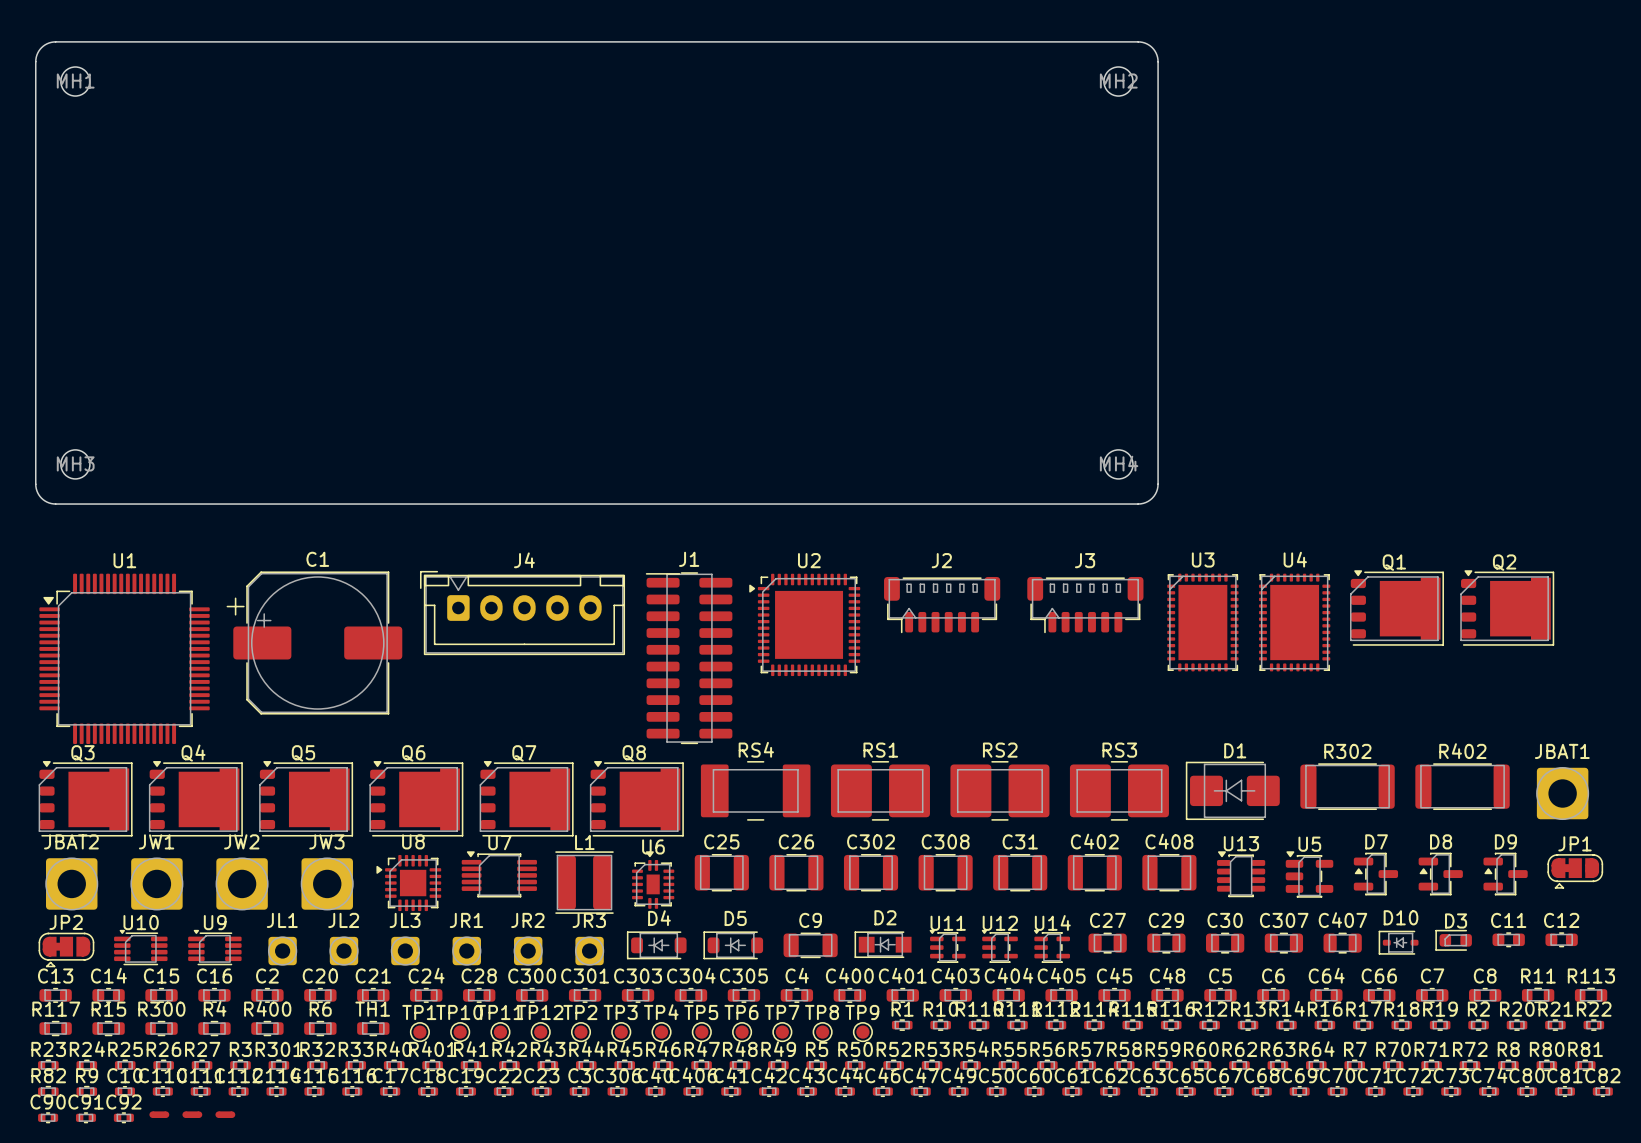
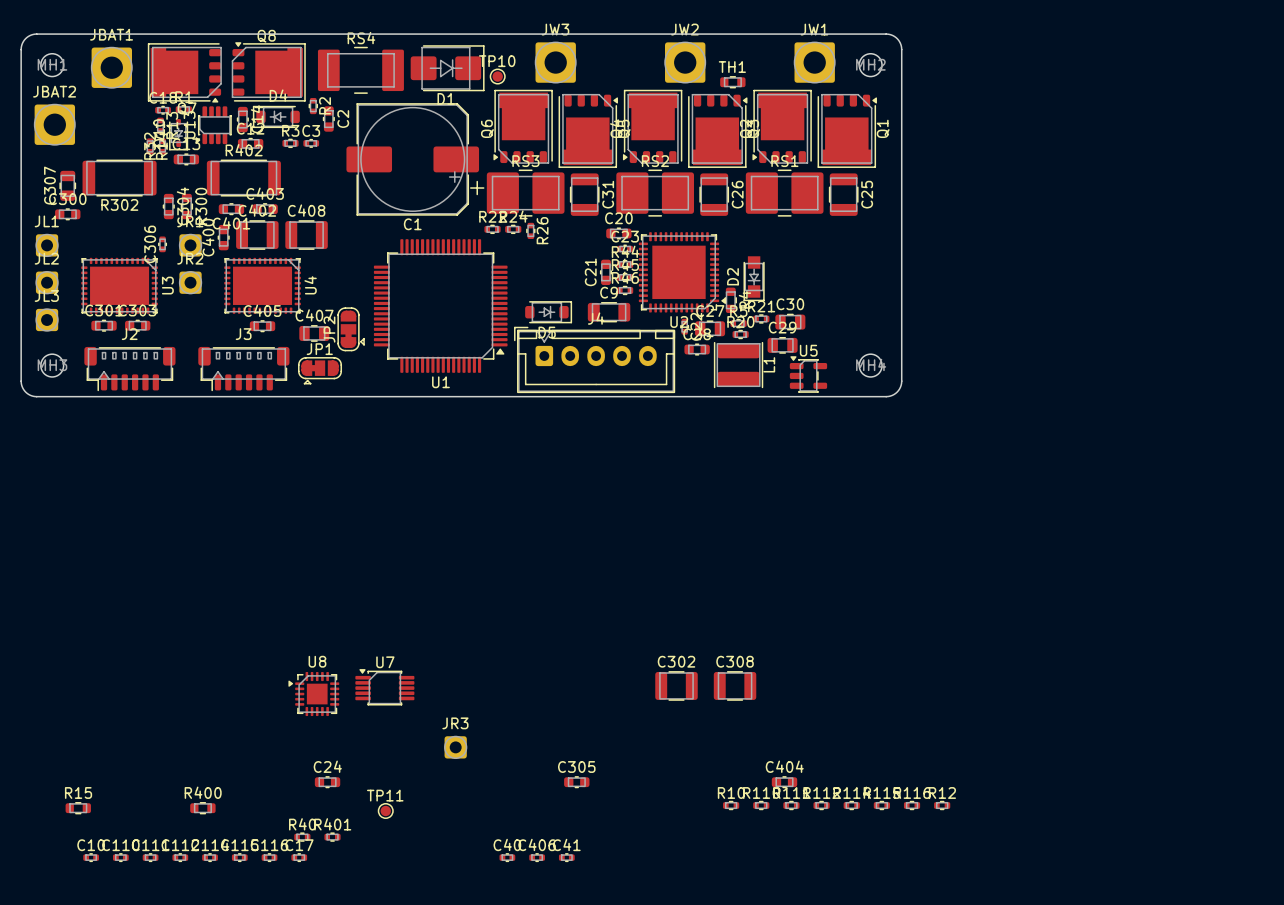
J2 position: (942, 605) -> (129, 368)
J3 position: (1085, 605) -> (243, 368)
Q1 rotation: 0° (1397, 608) -> 90° clockwise (847, 130)
Q1 position: (1397, 608) -> (847, 130)
Q2 rotation: 0° (1507, 608) -> 90° counterclockwise (782, 126)
Q2 position: (1507, 608) -> (782, 126)
J4 position: (522, 613) -> (594, 359)
U3 rotation: 0° (1201, 622) -> 90° clockwise (119, 284)
U3 position: (1201, 622) -> (119, 284)
U4 rotation: 0° (1293, 622) -> 90° clockwise (262, 284)
U4 position: (1293, 622) -> (262, 284)
U2 rotation: 0° (804, 624) -> 180° (682, 272)
U2 position: (804, 624) -> (682, 272)
C1 rotation: 0° (314, 642) -> 180° (415, 159)
C1 position: (314, 642) -> (415, 159)
U1 rotation: 0° (124, 658) -> 180° (440, 306)
U1 position: (124, 658) -> (440, 306)
J1: (689, 658) -> none
R302 name position: R302 (1347, 751) -> R302 (119, 204)
R302 position: (1347, 786) -> (119, 178)
R402 position: (1462, 786) -> (243, 178)
RS4 position: (755, 790) -> (360, 70)
RS1 position: (880, 790) -> (784, 193)
RS2 position: (999, 790) -> (655, 193)
RS3 position: (1119, 790) -> (525, 193)
D1 rotation: 0° (1232, 790) -> 180° (447, 68)
D1 position: (1232, 790) -> (447, 68)
JBAT1 position: (1562, 793) -> (111, 67)
Q3 rotation: 0° (85, 798) -> 90° clockwise (717, 130)
Q3 position: (85, 798) -> (717, 130)
Q4 rotation: 0° (195, 798) -> 90° counterclockwise (652, 126)
Q4 position: (195, 798) -> (652, 126)
Q5 rotation: 0° (306, 798) -> 90° clockwise (588, 130)
Q5 position: (306, 798) -> (588, 130)
Q6 rotation: 0° (416, 798) -> 90° counterclockwise (523, 126)
Q6 position: (416, 798) -> (523, 126)
Q7 rotation: 0° (526, 798) -> 180° (184, 72)
Q7 position: (526, 798) -> (184, 72)
Q8 position: (636, 798) -> (268, 71)
JP1 position: (1575, 871) -> (320, 370)
C25 rotation: 0° (721, 872) -> 90° clockwise (843, 194)
C25 position: (721, 872) -> (843, 194)
C26 rotation: 0° (796, 872) -> 90° clockwise (714, 194)
C26 position: (796, 872) -> (714, 194)
C31 rotation: 0° (1020, 872) -> 90° clockwise (584, 194)
C31 position: (1020, 872) -> (584, 194)
C402 position: (1094, 872) -> (257, 235)
C408 position: (1169, 872) -> (306, 235)
U13 rotation: 0° (1241, 874) -> 90° counterclockwise (213, 125)
U13 position: (1241, 874) -> (213, 125)
U5 position: (1309, 874) -> (808, 374)
D7: (1375, 874) -> none
D8: (1440, 874) -> none
D9: (1505, 874) -> none
U6: (653, 880) -> none
L1 rotation: 0° (584, 882) -> 90° clockwise (738, 365)
L1 position: (584, 882) -> (738, 365)
JBAT2 position: (71, 883) -> (54, 124)
JW1 position: (156, 883) -> (814, 62)
JW2 position: (242, 883) -> (685, 62)
JW3 position: (327, 883) -> (555, 62)
C307 name position: C307 (1284, 920) -> C307 (49, 185)
C11: (1508, 939) -> none
C12 position: (1561, 939) -> (250, 143)
D3: (1453, 940) -> none
D10 rotation: 0° (1398, 942) -> 90° counterclockwise (178, 134)
D10 position: (1398, 942) -> (178, 134)
C27 position: (1107, 943) -> (710, 328)
C29 position: (1166, 943) -> (782, 345)
C30 position: (1225, 943) -> (790, 322)
C307 rotation: 0° (1283, 943) -> 90° clockwise (67, 185)
C307 position: (1283, 943) -> (67, 185)
C407 position: (1342, 943) -> (314, 333)
D2 rotation: 0° (883, 944) -> 90° counterclockwise (754, 278)
D2 position: (883, 944) -> (754, 278)
D4 position: (656, 945) -> (276, 116)
D5 rotation: 0° (733, 945) -> 180° (548, 312)
D5 position: (733, 945) -> (548, 312)
C9 position: (810, 945) -> (609, 312)
U11: (947, 946) -> none
U12: (999, 946) -> none
U14: (1051, 946) -> none
U10: (140, 947) -> none
U9: (214, 947) -> none
JP2 rotation: 0° (66, 949) -> 90° counterclockwise (351, 329)
JP2 position: (66, 949) -> (351, 329)
JL1 position: (282, 951) -> (47, 245)
JL2 position: (344, 951) -> (47, 282)
JL3 position: (405, 951) -> (47, 319)
JR1 position: (466, 951) -> (190, 245)
JR2 position: (528, 951) -> (190, 282)
C400 name position: C400 (849, 975) -> C400 (208, 237)
C401 name position: C401 (902, 975) -> C401 (231, 223)
C21 name position: C21 (373, 976) -> C21 (590, 272)
C13 position: (55, 995) -> (186, 159)
C14 rotation: 0° (108, 995) -> 90° clockwise (242, 119)
C14 position: (108, 995) -> (242, 119)
C15: (161, 995) -> none
C16: (214, 995) -> none
C2 rotation: 0° (267, 995) -> 90° clockwise (328, 119)
C2 position: (267, 995) -> (328, 119)
C20 position: (320, 995) -> (618, 233)
C21 rotation: 0° (373, 995) -> 90° clockwise (605, 272)
C21 position: (373, 995) -> (605, 272)
C28 position: (479, 995) -> (697, 349)
C300 position: (532, 995) -> (67, 214)
C301 position: (585, 995) -> (104, 325)
C303 position: (638, 995) -> (137, 325)
C304 rotation: 0° (690, 995) -> 90° clockwise (168, 206)
C304 position: (690, 995) -> (168, 206)
C4: (796, 995) -> none
C400 rotation: 0° (849, 995) -> 90° clockwise (223, 237)
C400 position: (849, 995) -> (223, 237)
C401 position: (902, 995) -> (231, 209)
C403 position: (955, 995) -> (265, 209)
C405 position: (1061, 995) -> (262, 326)
C45: (1114, 995) -> none
C48: (1167, 995) -> none
C5: (1220, 995) -> none
C6: (1273, 995) -> none
C64: (1326, 995) -> none
C66: (1379, 995) -> none
C7: (1432, 995) -> none
C8: (1485, 995) -> none
R11: (1538, 995) -> none
R113: (1591, 995) -> none
R1 position: (902, 1025) -> (183, 109)
R13 rotation: 0° (1248, 1025) -> 90° clockwise (160, 125)
R13 position: (1248, 1025) -> (160, 125)
R14 rotation: 0° (1286, 1025) -> 90° clockwise (150, 146)
R14 position: (1286, 1025) -> (150, 146)
R16: (1324, 1025) -> none
R17: (1363, 1025) -> none
R18: (1401, 1025) -> none
R19: (1440, 1025) -> none
R2 rotation: 0° (1478, 1025) -> 90° clockwise (313, 106)
R2 position: (1478, 1025) -> (313, 106)
R20 position: (1517, 1025) -> (740, 334)
R21 position: (1555, 1025) -> (761, 318)
R22 position: (1593, 1025) -> (492, 229)
R117: (55, 1028) -> none
R300 rotation: 0° (161, 1028) -> 90° clockwise (186, 206)
R300 position: (161, 1028) -> (186, 206)
R4 rotation: 0° (214, 1028) -> 90° clockwise (730, 300)
R4 position: (214, 1028) -> (730, 300)
R6: (320, 1028) -> none
TH1 position: (373, 1028) -> (732, 82)
TP1: (419, 1032) -> none
TP10 position: (460, 1032) -> (497, 76)
TP12: (540, 1032) -> none
TP2: (581, 1032) -> none
TP3: (621, 1032) -> none
TP4: (661, 1032) -> none
TP5: (701, 1032) -> none
TP6: (742, 1032) -> none
TP7: (782, 1032) -> none
TP8: (822, 1032) -> none
TP9: (862, 1032) -> none
R23: (48, 1065) -> none
R24 position: (86, 1065) -> (513, 229)
R25: (125, 1065) -> none
R26 rotation: 0° (163, 1065) -> 90° clockwise (530, 230)
R26 position: (163, 1065) -> (530, 230)
R27: (202, 1065) -> none
R3 position: (240, 1065) -> (290, 143)
R301: (278, 1065) -> none
R32 rotation: 0° (317, 1065) -> 90° clockwise (162, 146)
R32 position: (317, 1065) -> (162, 146)
R33: (355, 1065) -> none
R41: (471, 1065) -> none
R42: (509, 1065) -> none
R43: (547, 1065) -> none
R44 position: (586, 1065) -> (625, 264)
R45 position: (624, 1065) -> (625, 277)
R46 position: (663, 1065) -> (625, 290)
R47: (701, 1065) -> none
R48: (739, 1065) -> none
R49: (778, 1065) -> none
R5 position: (816, 1065) -> (738, 323)
R50: (855, 1065) -> none
R52: (893, 1065) -> none
R53: (932, 1065) -> none
R54: (970, 1065) -> none
R55: (1008, 1065) -> none
R56: (1047, 1065) -> none
R57: (1085, 1065) -> none
R58: (1124, 1065) -> none
R59: (1162, 1065) -> none
R60: (1201, 1065) -> none
R62: (1239, 1065) -> none
R63: (1277, 1065) -> none
R64: (1316, 1065) -> none
R7: (1354, 1065) -> none
R70: (1393, 1065) -> none
R71: (1431, 1065) -> none
R72: (1470, 1065) -> none
R8: (1508, 1065) -> none
R80: (1546, 1065) -> none
R81: (1585, 1065) -> none
R82: (48, 1091) -> none
R9: (86, 1091) -> none
C18 position: (428, 1091) -> (163, 110)
C19: (466, 1091) -> none
C22 rotation: 0° (503, 1091) -> 90° clockwise (684, 326)
C22 position: (503, 1091) -> (684, 326)
C23 position: (541, 1091) -> (625, 249)
C3 position: (579, 1091) -> (311, 143)
C306 rotation: 0° (617, 1091) -> 90° clockwise (162, 244)
C306 position: (617, 1091) -> (162, 244)
C42: (769, 1091) -> none
C43: (807, 1091) -> none
C44: (844, 1091) -> none
C46: (882, 1091) -> none
C47: (920, 1091) -> none
C49: (958, 1091) -> none
C50: (996, 1091) -> none
C60: (1034, 1091) -> none
C61: (1072, 1091) -> none
C62: (1110, 1091) -> none
C63: (1148, 1091) -> none
C65: (1185, 1091) -> none
C67: (1223, 1091) -> none
C68: (1261, 1091) -> none
C69: (1299, 1091) -> none
C70: (1337, 1091) -> none
C71: (1375, 1091) -> none
C72: (1413, 1091) -> none
C73: (1451, 1091) -> none
C74: (1489, 1091) -> none
C80: (1527, 1091) -> none
C81: (1564, 1091) -> none
C82: (1602, 1091) -> none
part: (159, 1114) -> none
part: (192, 1114) -> none
part: (225, 1114) -> none
C90: (48, 1117) -> none
C91: (86, 1117) -> none
C92: (123, 1117) -> none

